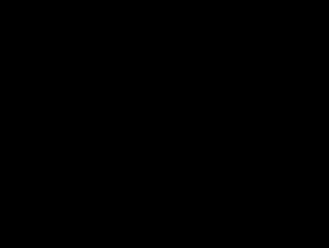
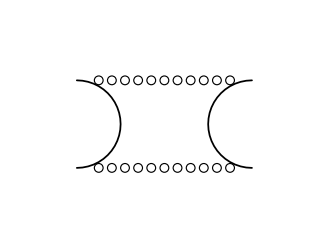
part: none -> (164, 124)

